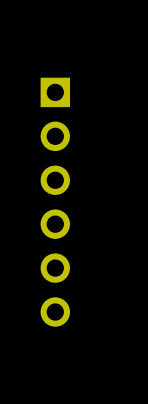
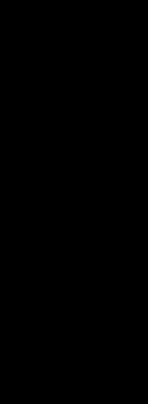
part: (55, 202) -> none

